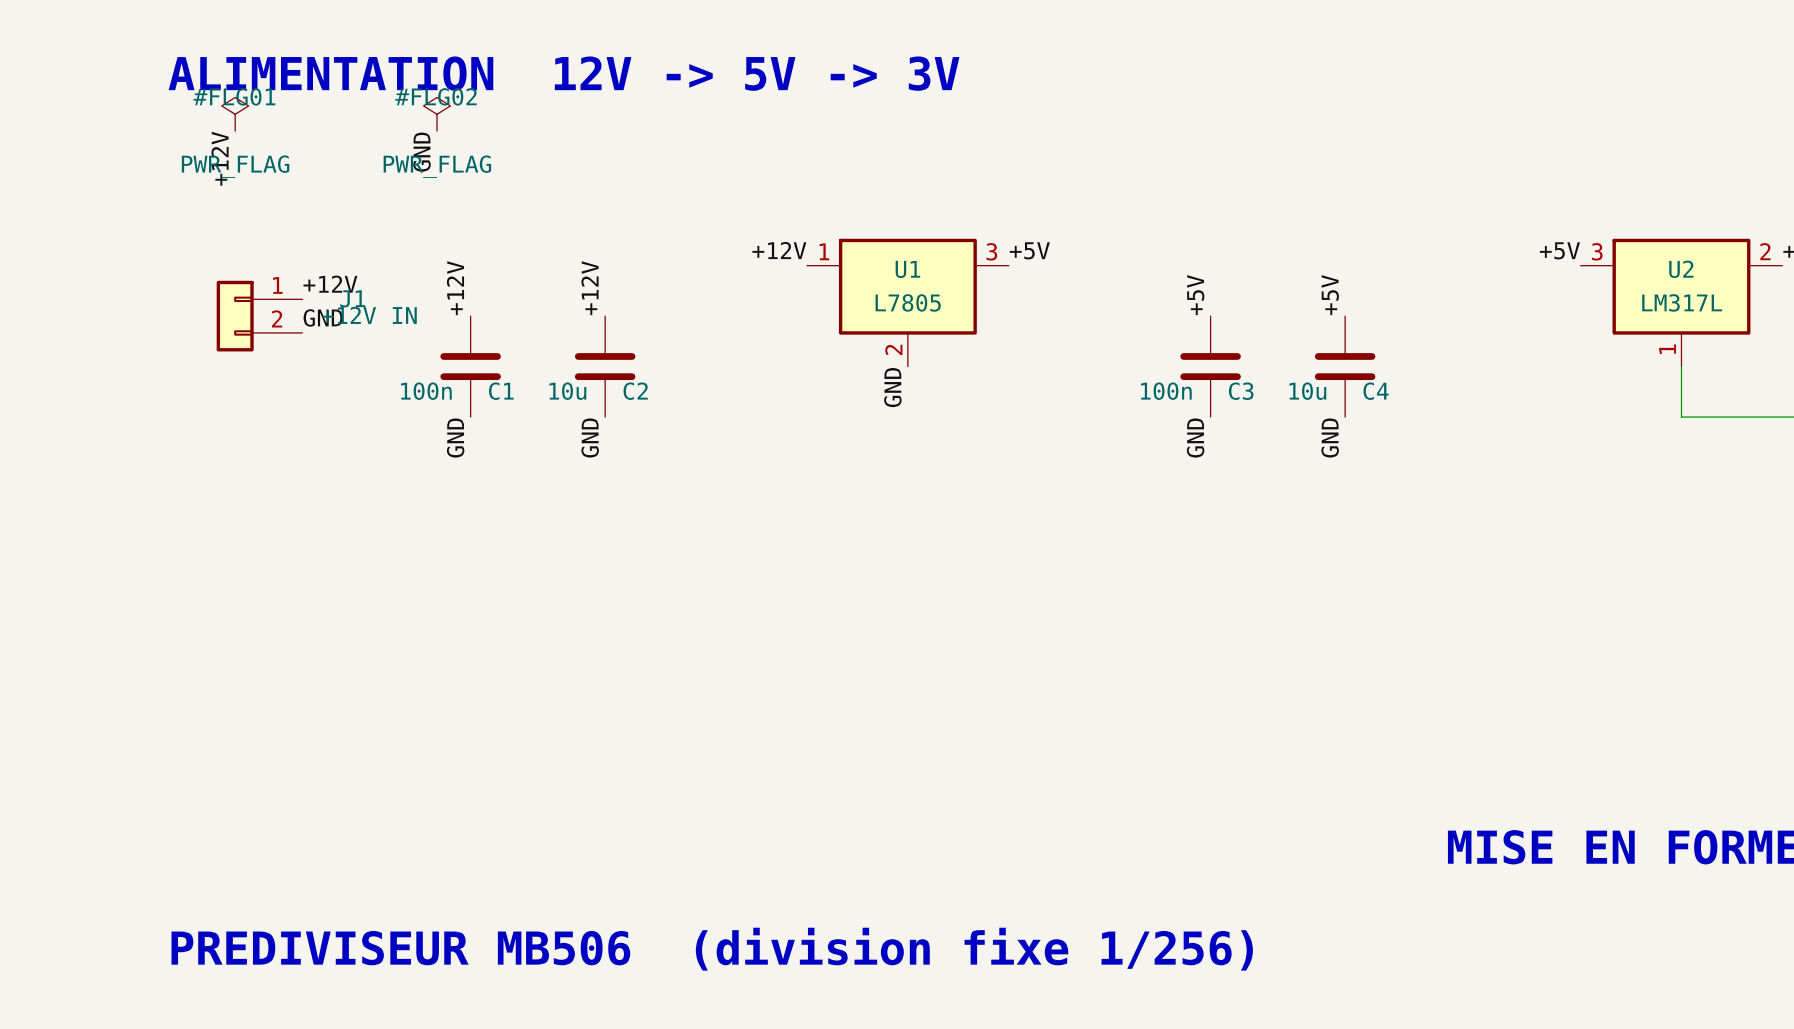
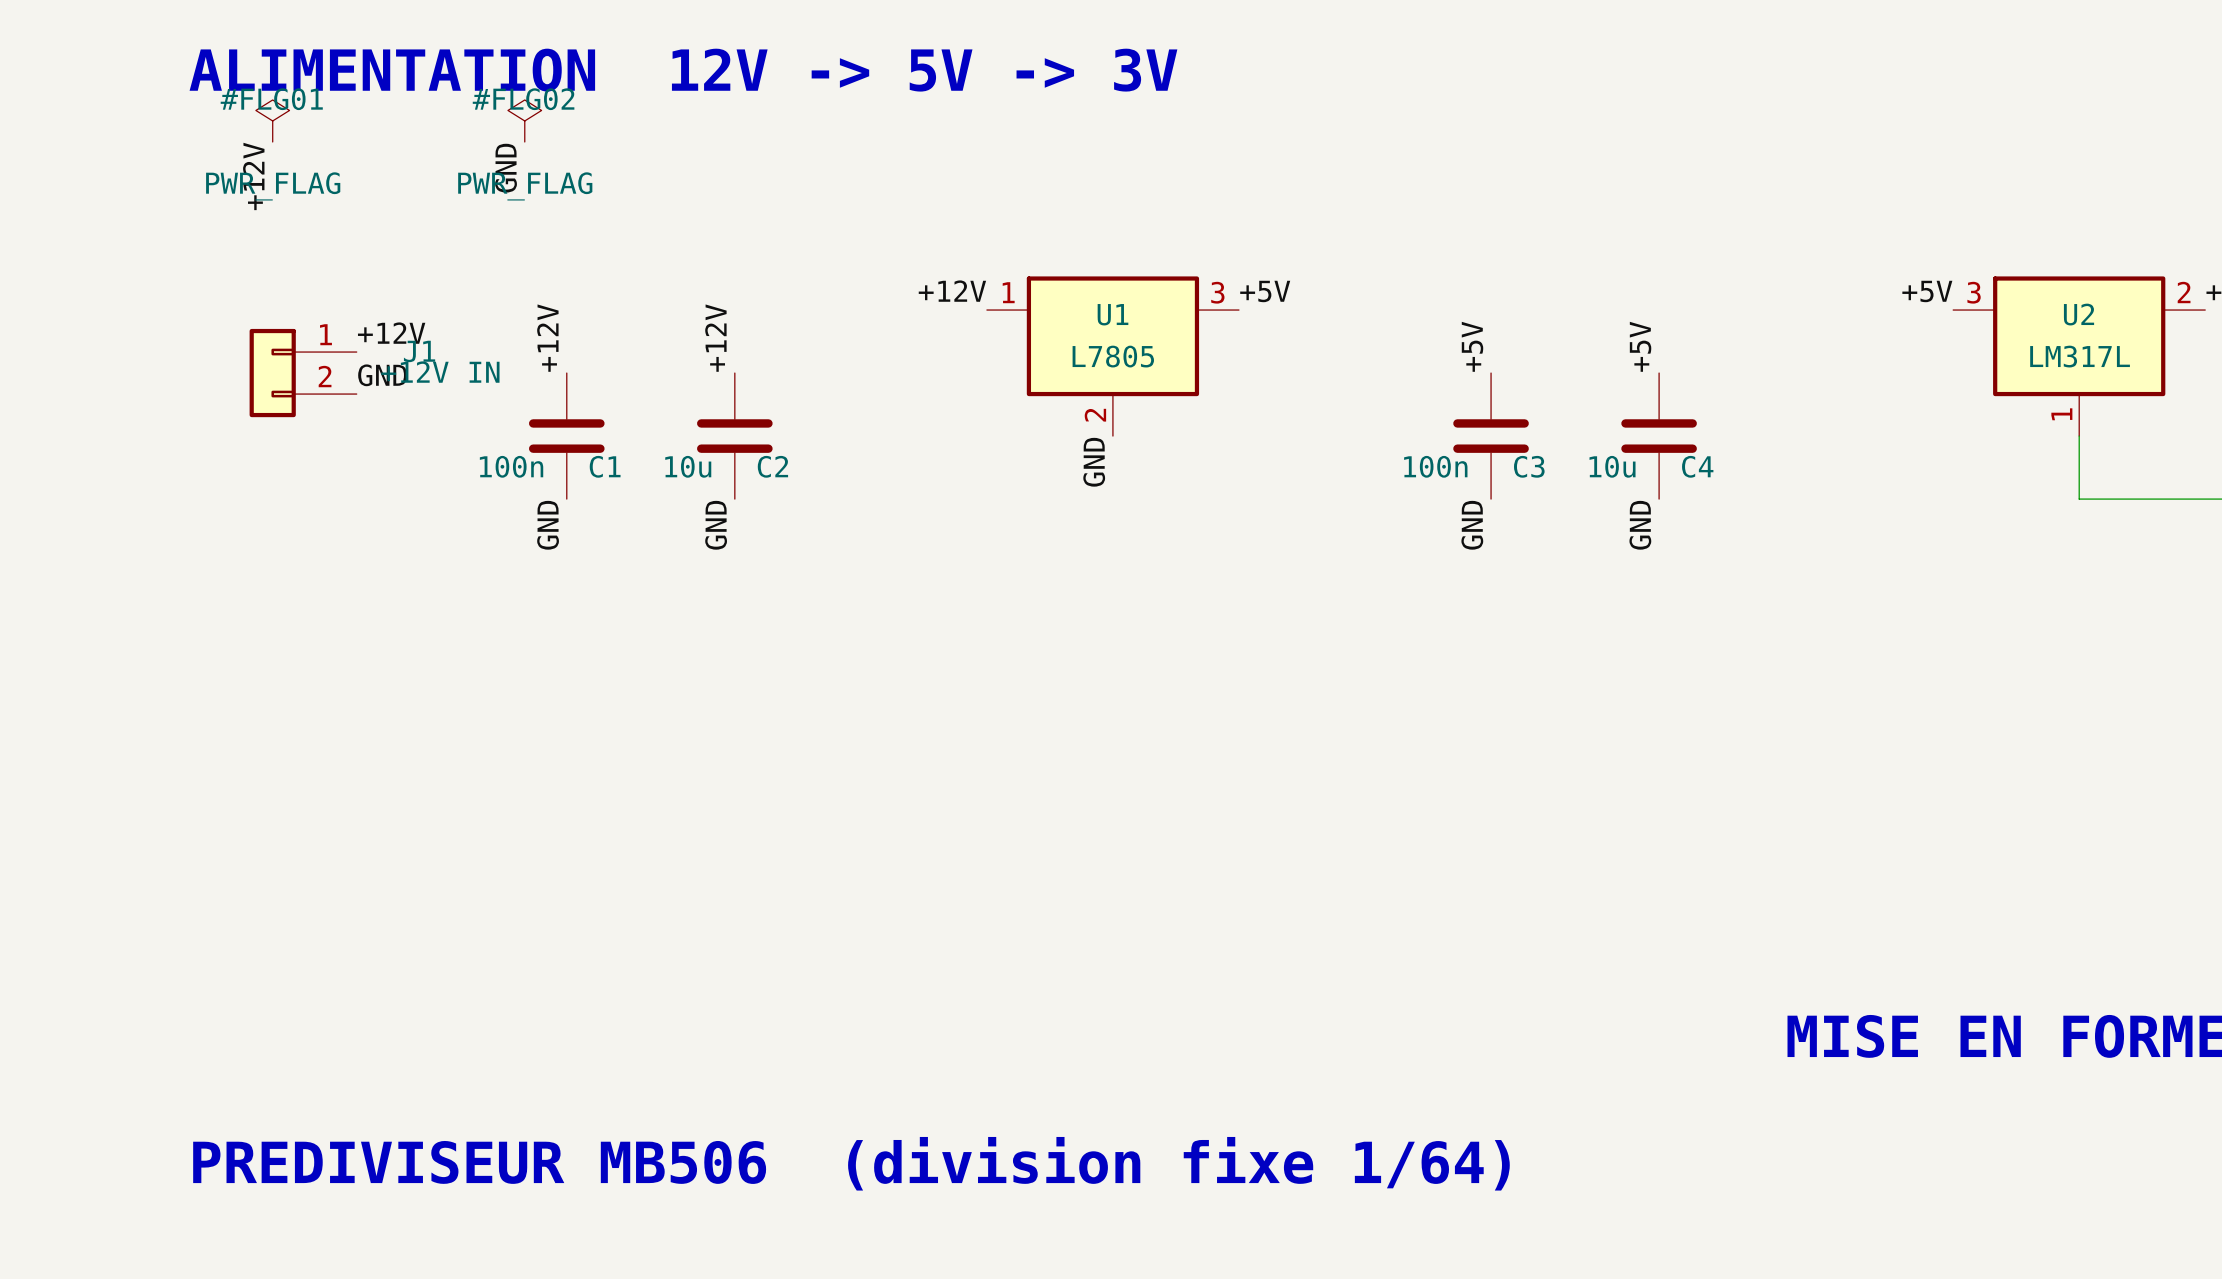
text: PREDIVISEUR MB506 (division fixe 1/256) (712, 949) -> PREDIVISEUR MB506 (division fixe 1/64) (851, 1163)

